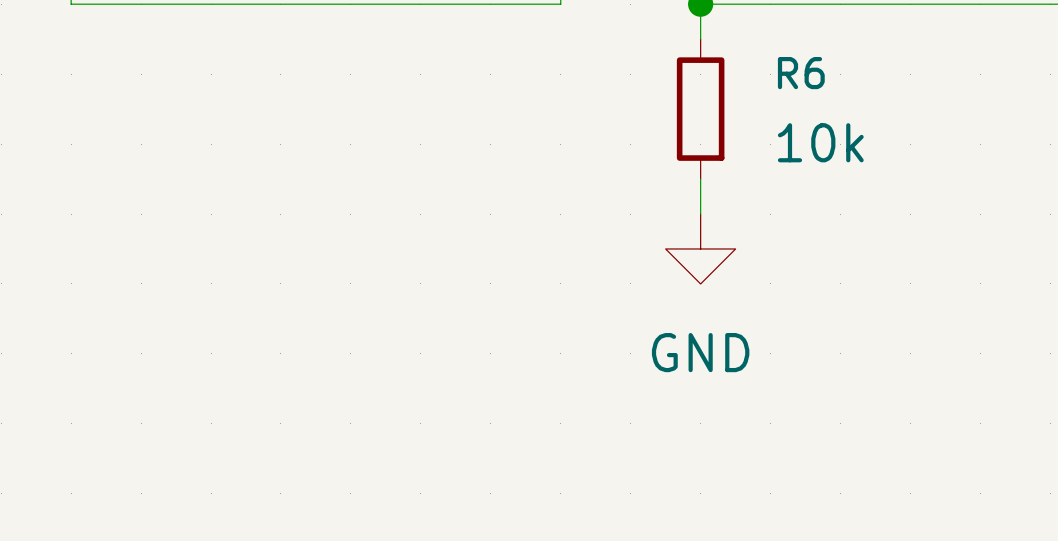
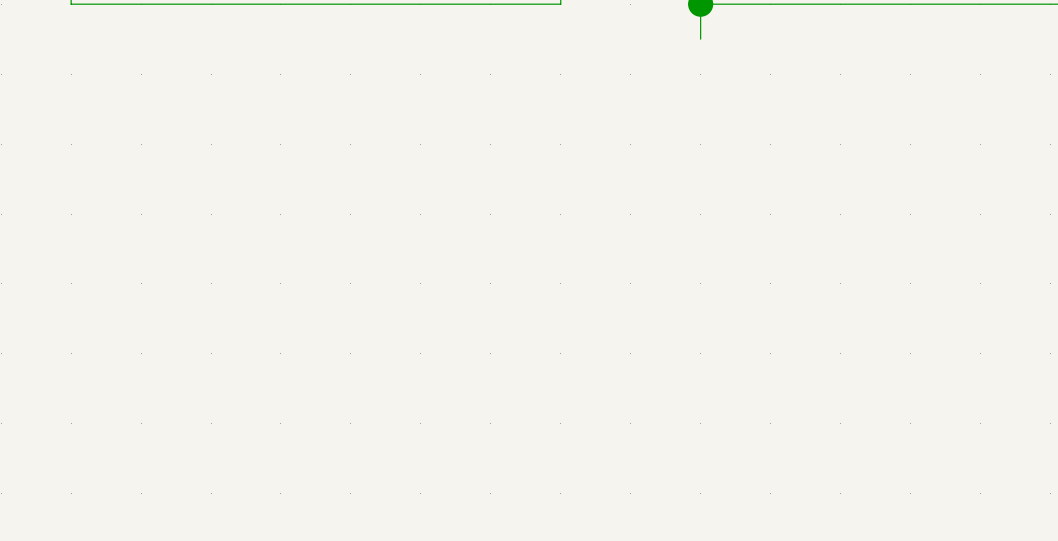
R6: 10k (700, 109) -> none
wire: (700, 179) (700, 214) -> none
power symbol: GND (700, 248) -> none

